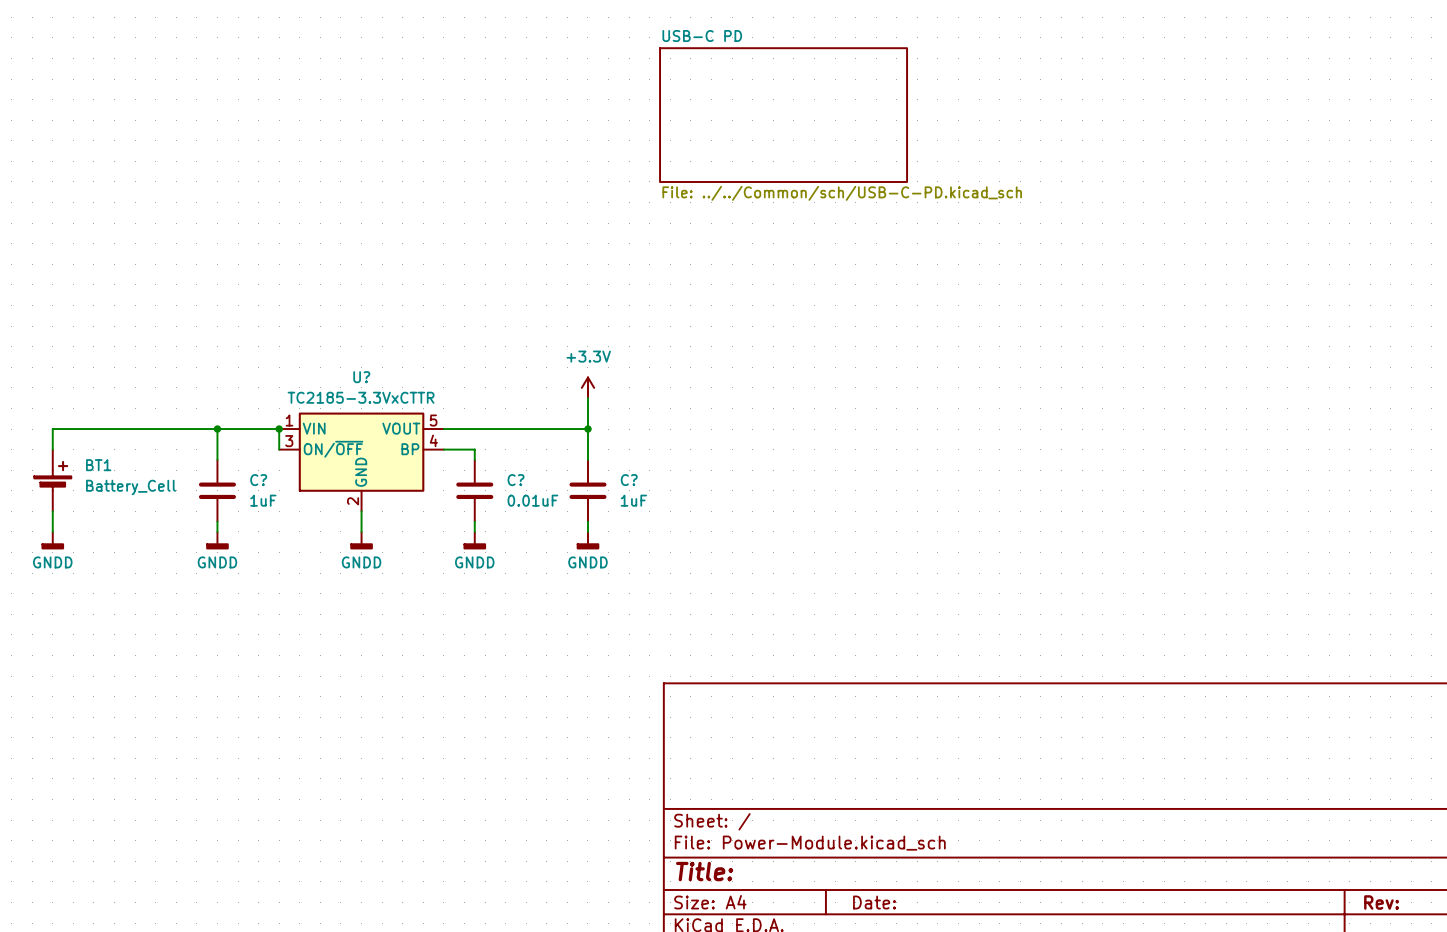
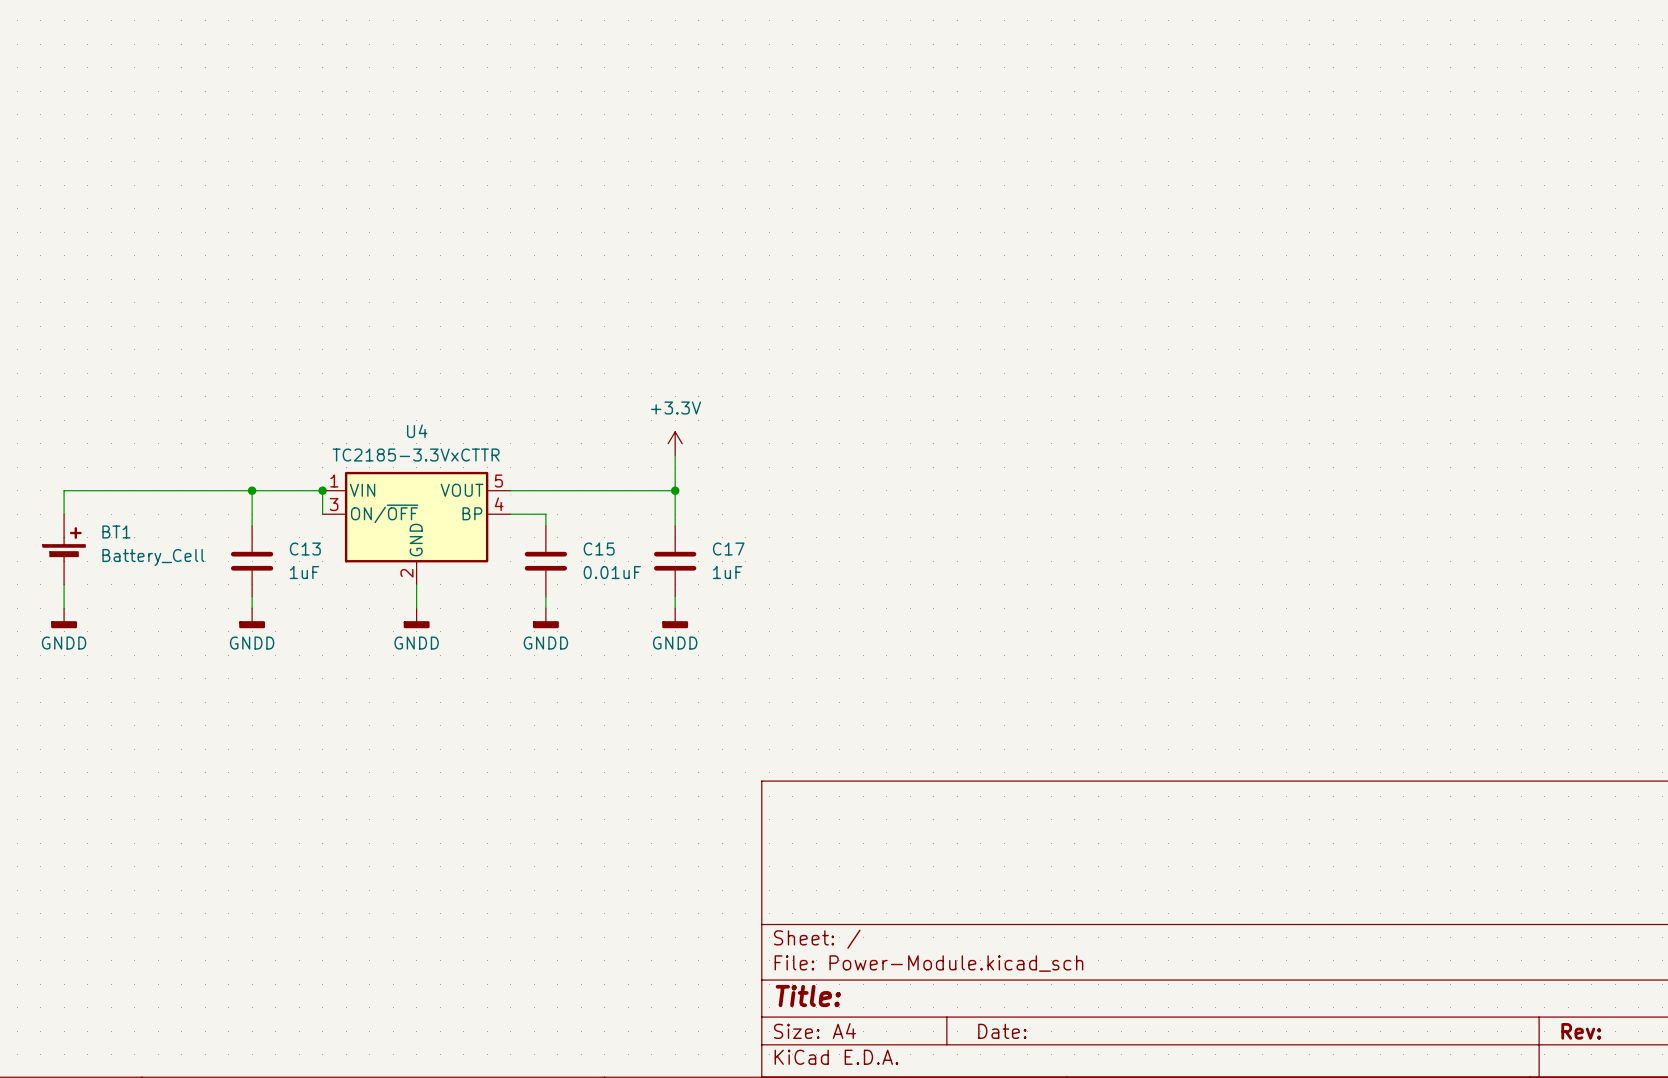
sheet USB-C PD: File: ../../Common/sch/USB-C-PD.kicad_sch (783, 115) -> none
U? name: U? (361, 377) -> U4 (417, 431)
C? name: C? (258, 480) -> C13 (305, 549)
C? name: C? (516, 480) -> C15 (599, 549)
C? name: C? (629, 480) -> C17 (728, 549)

